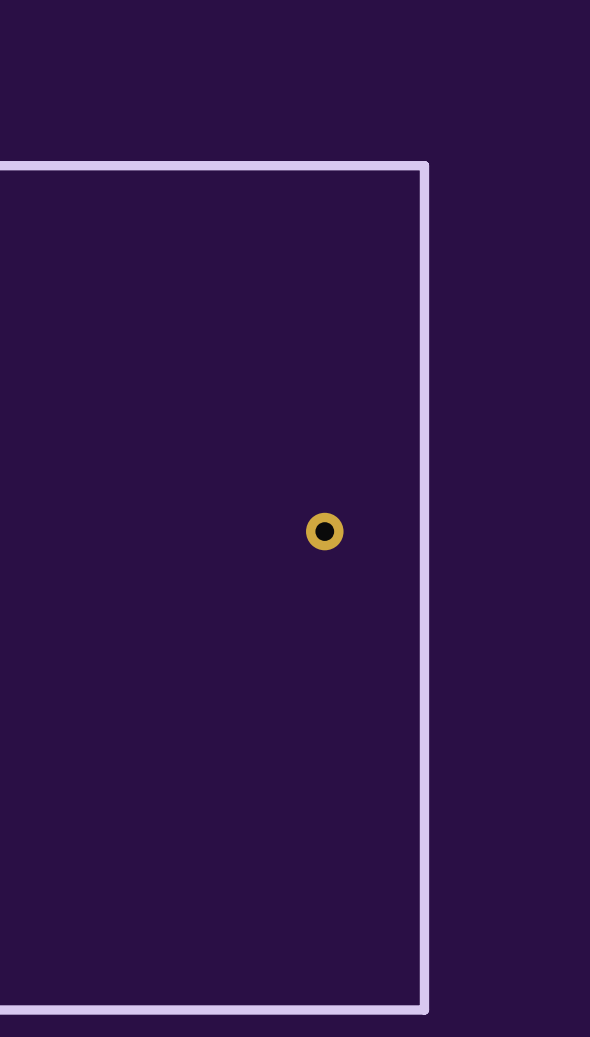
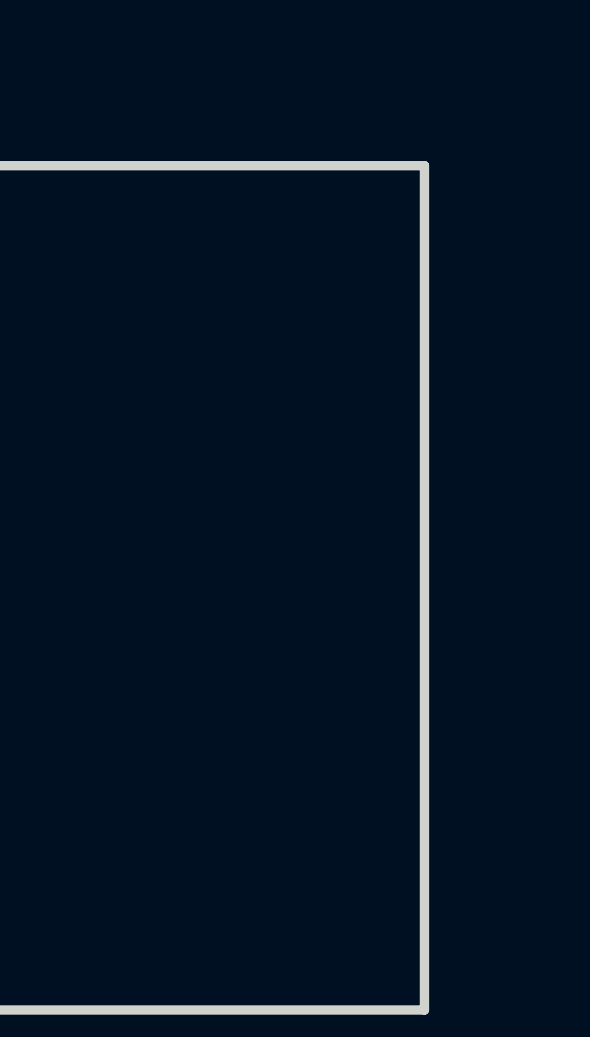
via: (324, 531) -> none

